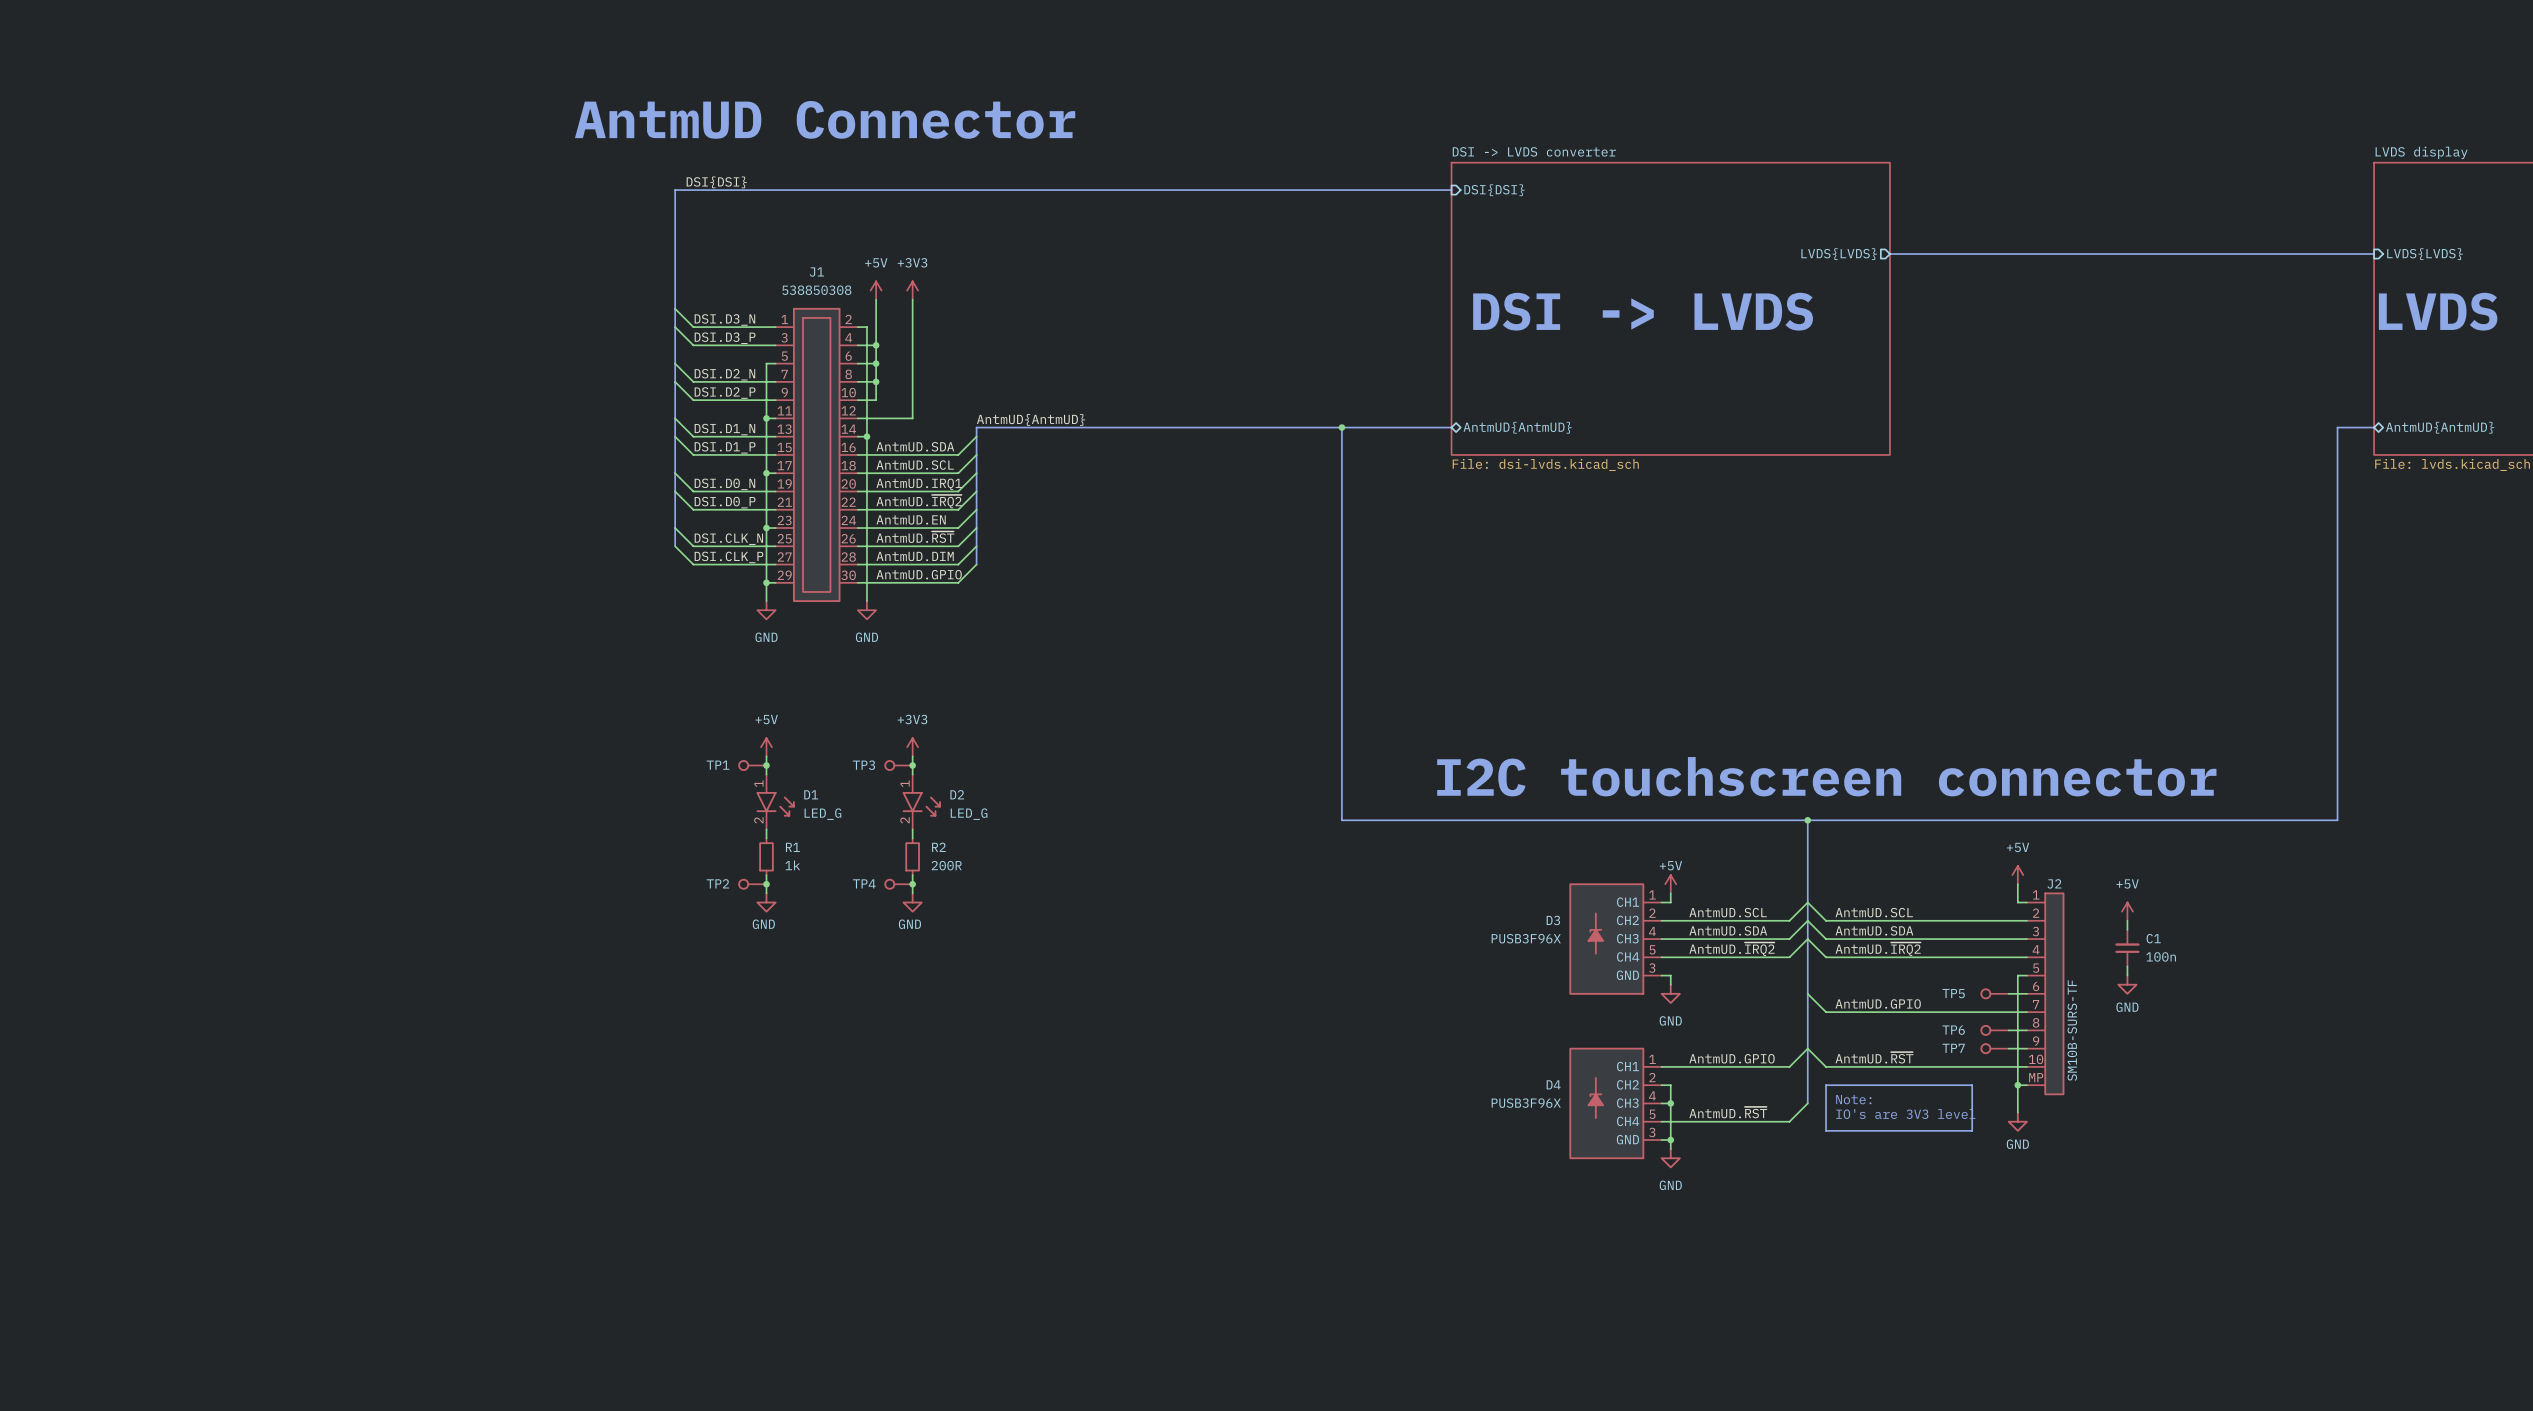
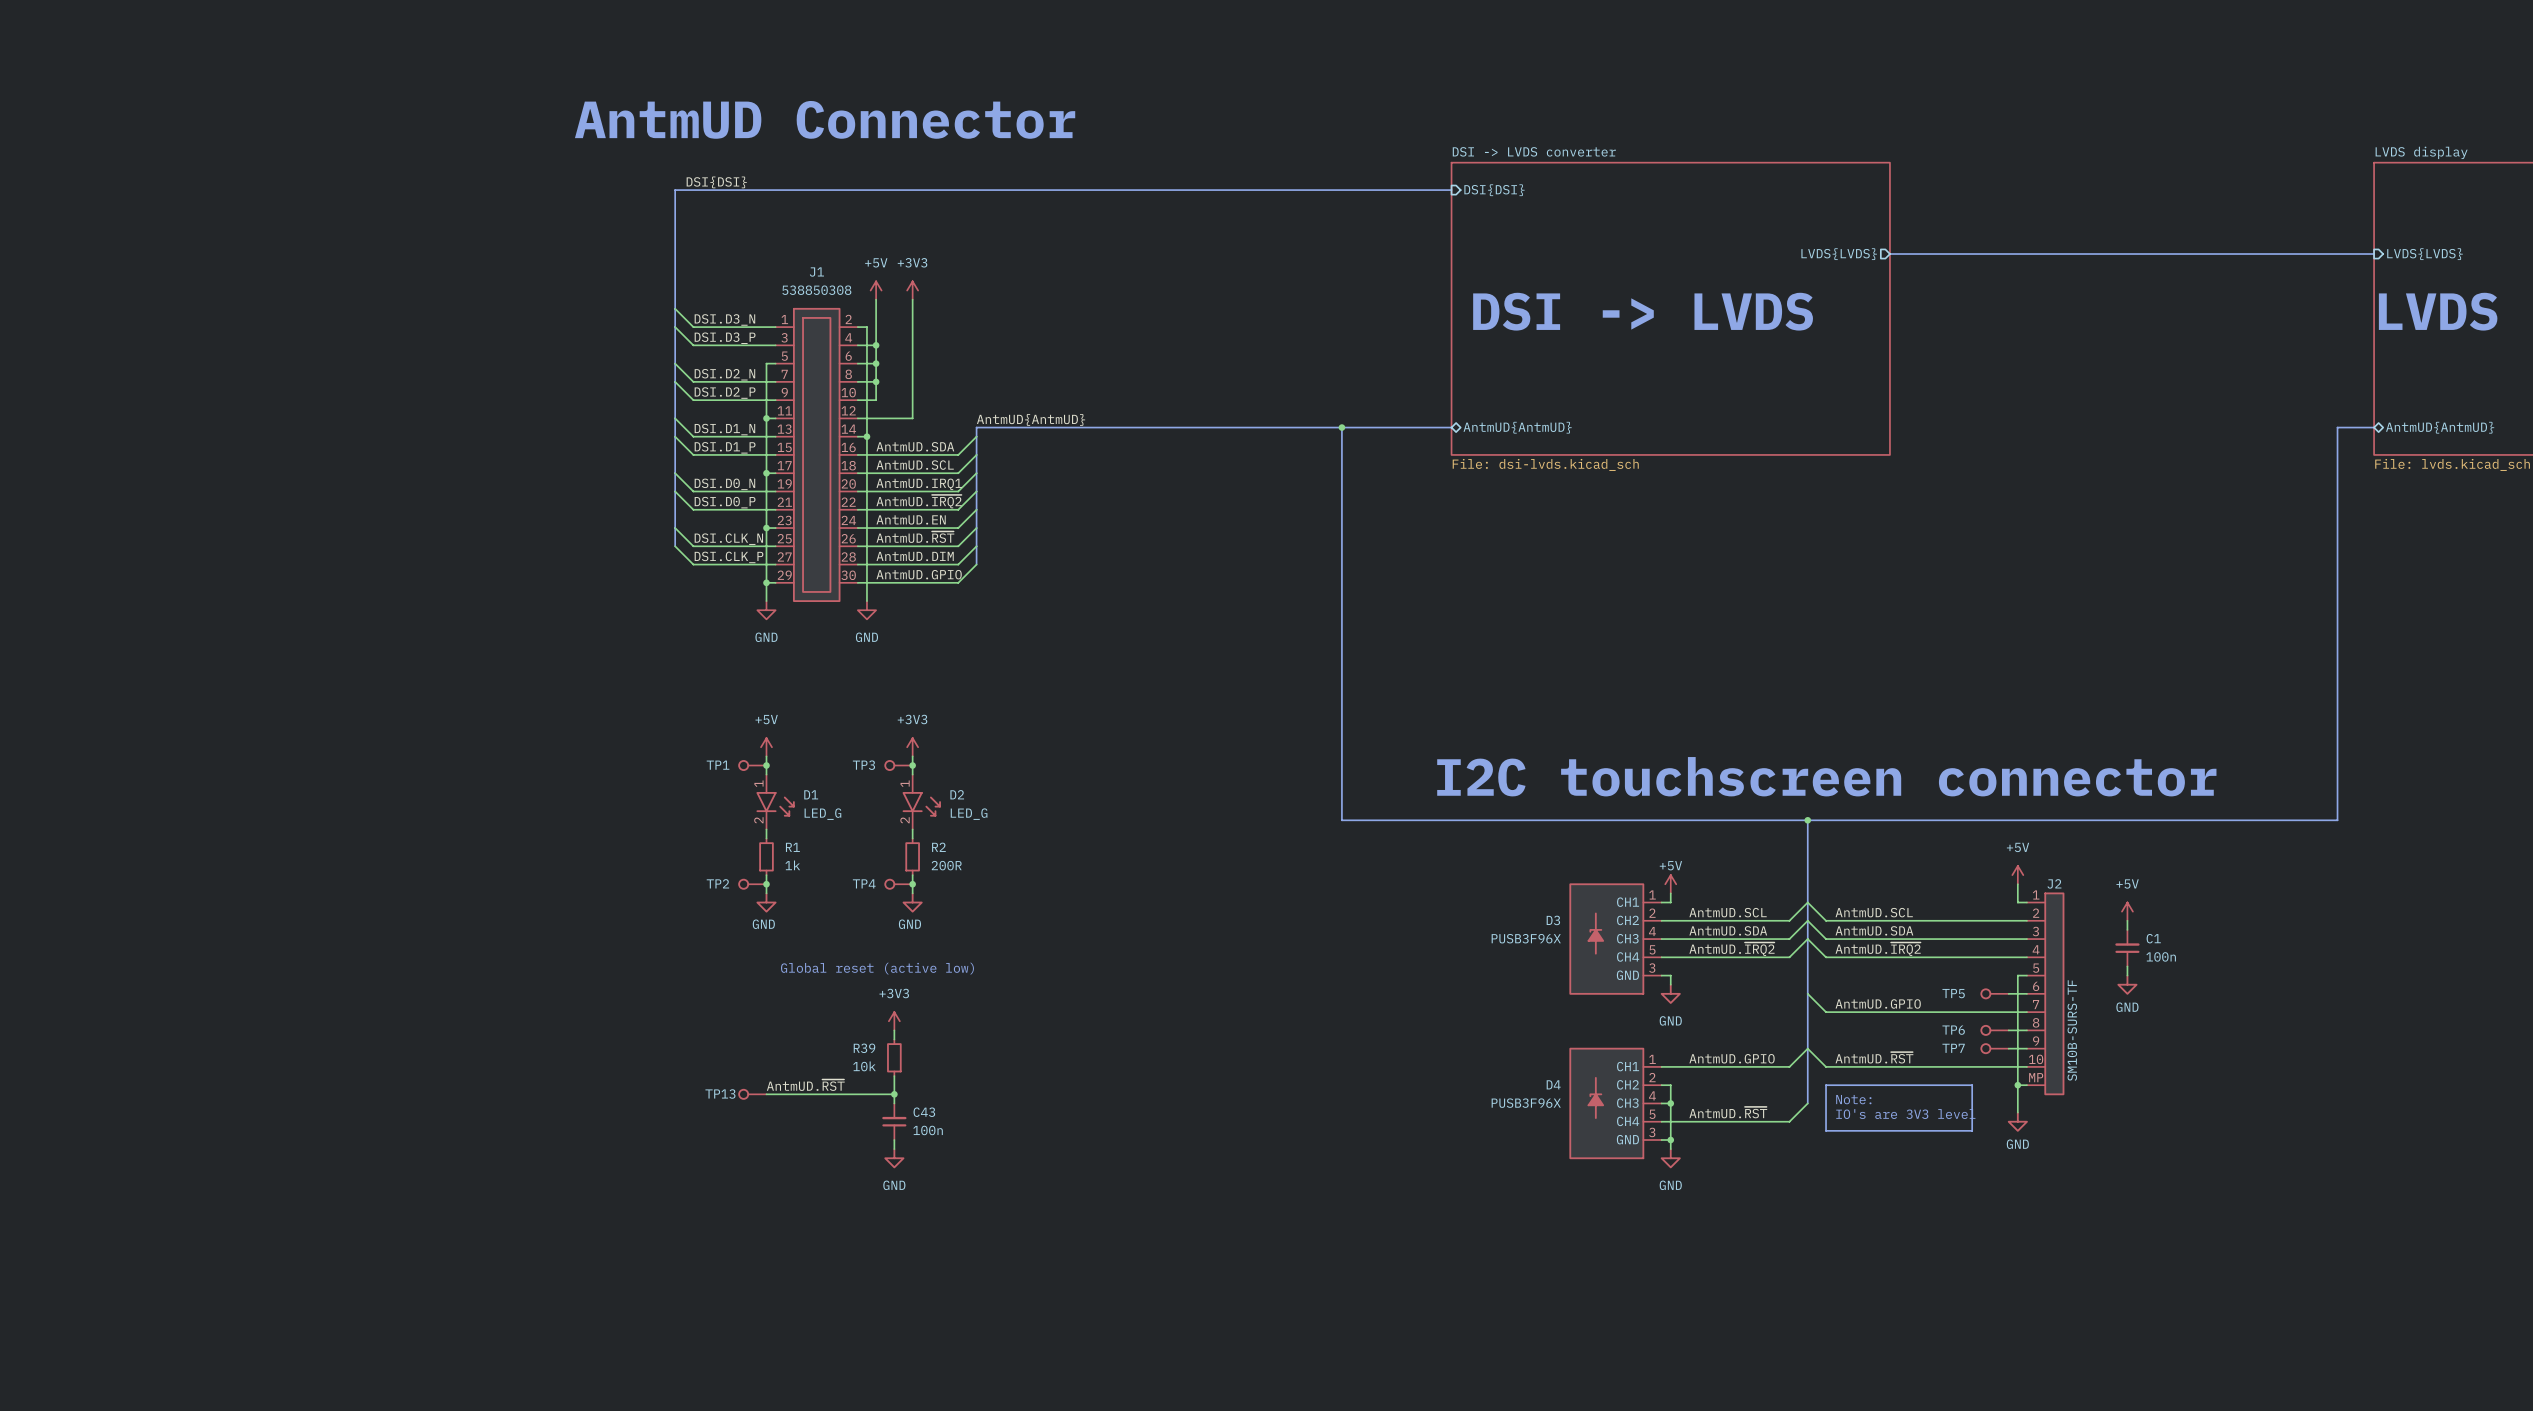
text: none -> Global reset (active low) (877, 968)
power symbol: none -> +3V3 (894, 1021)
wire: none -> (894, 1030) (894, 1039)
R39: none -> (894, 1057)
wire: none -> (894, 1076) (894, 1103)
label: none -> AntmUD.~{RST} (805, 1085)
TP13: none -> (752, 1094)
wire: none -> (766, 1094) (894, 1094)
junction: none -> (894, 1094)
C43: none -> (894, 1121)
wire: none -> (894, 1139) (894, 1149)
power symbol: none -> GND (894, 1158)

